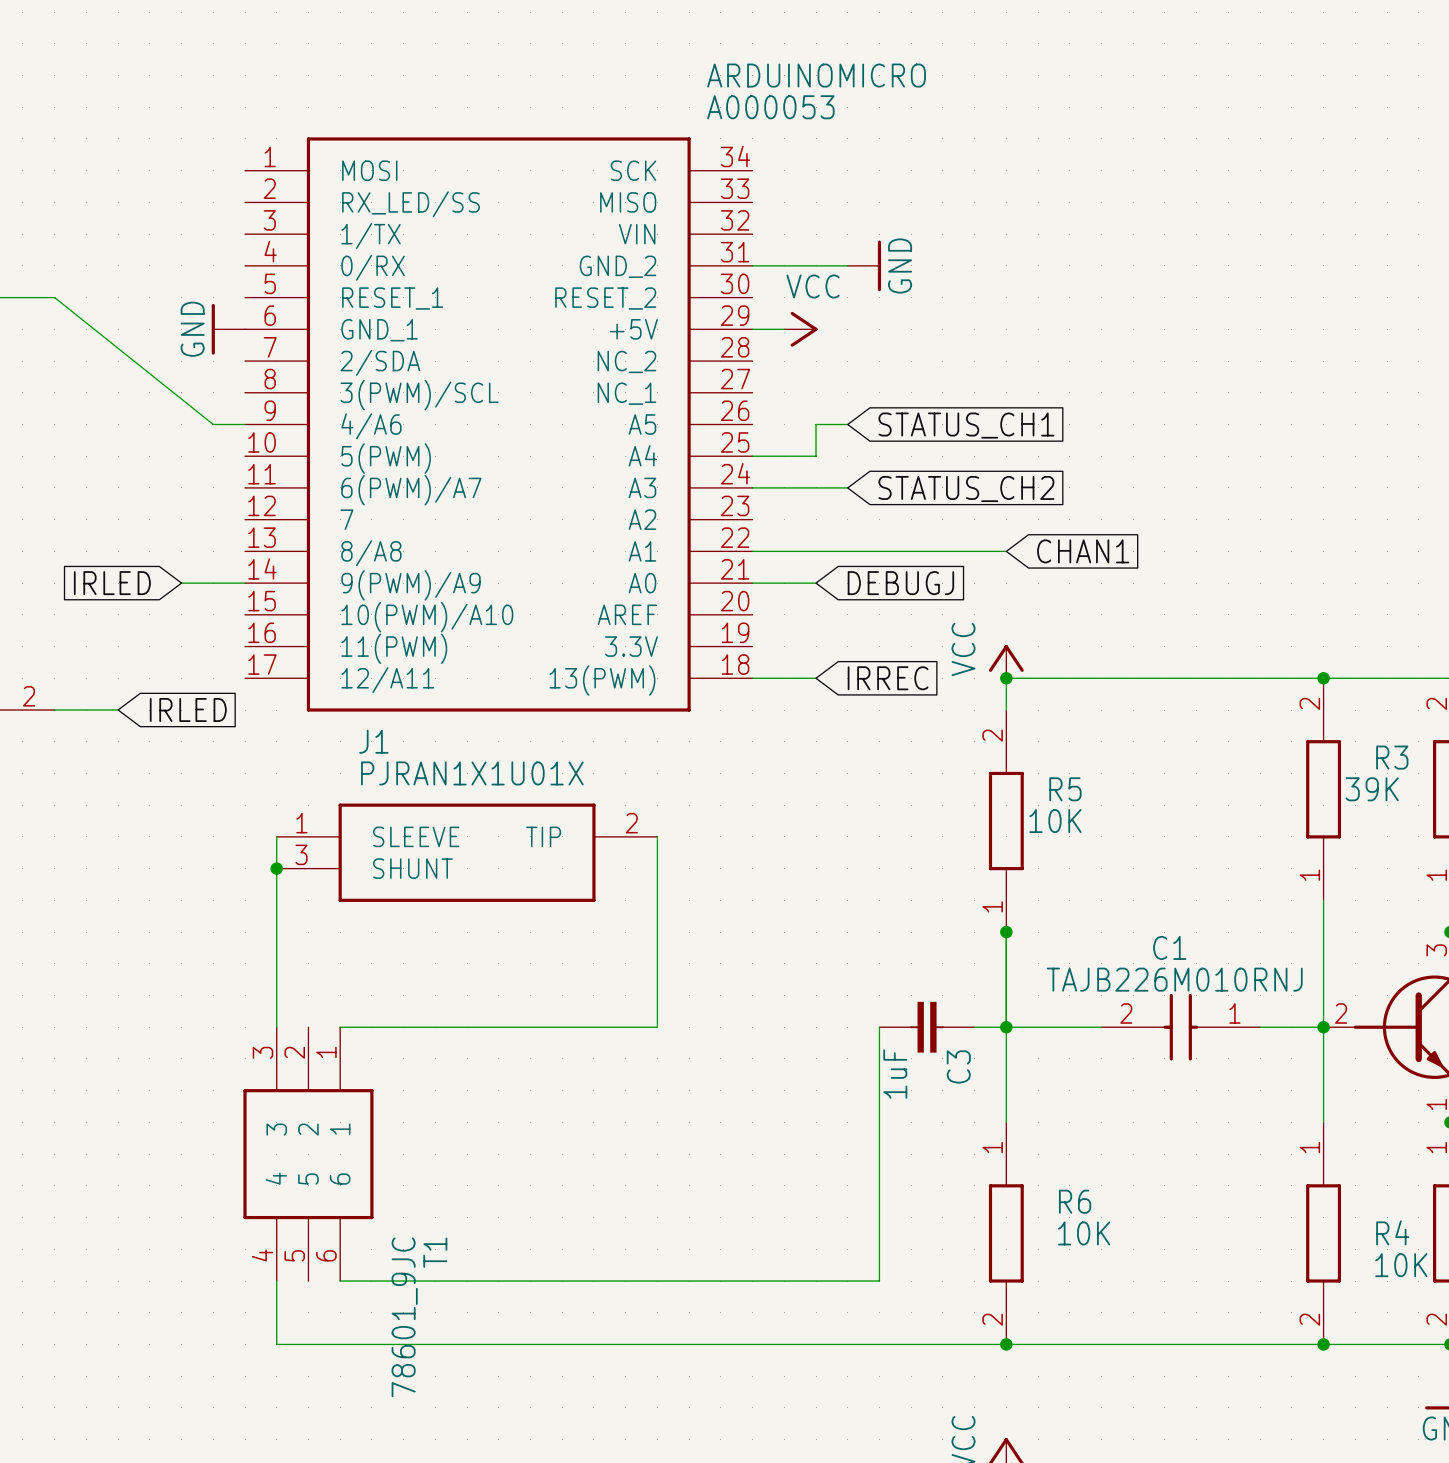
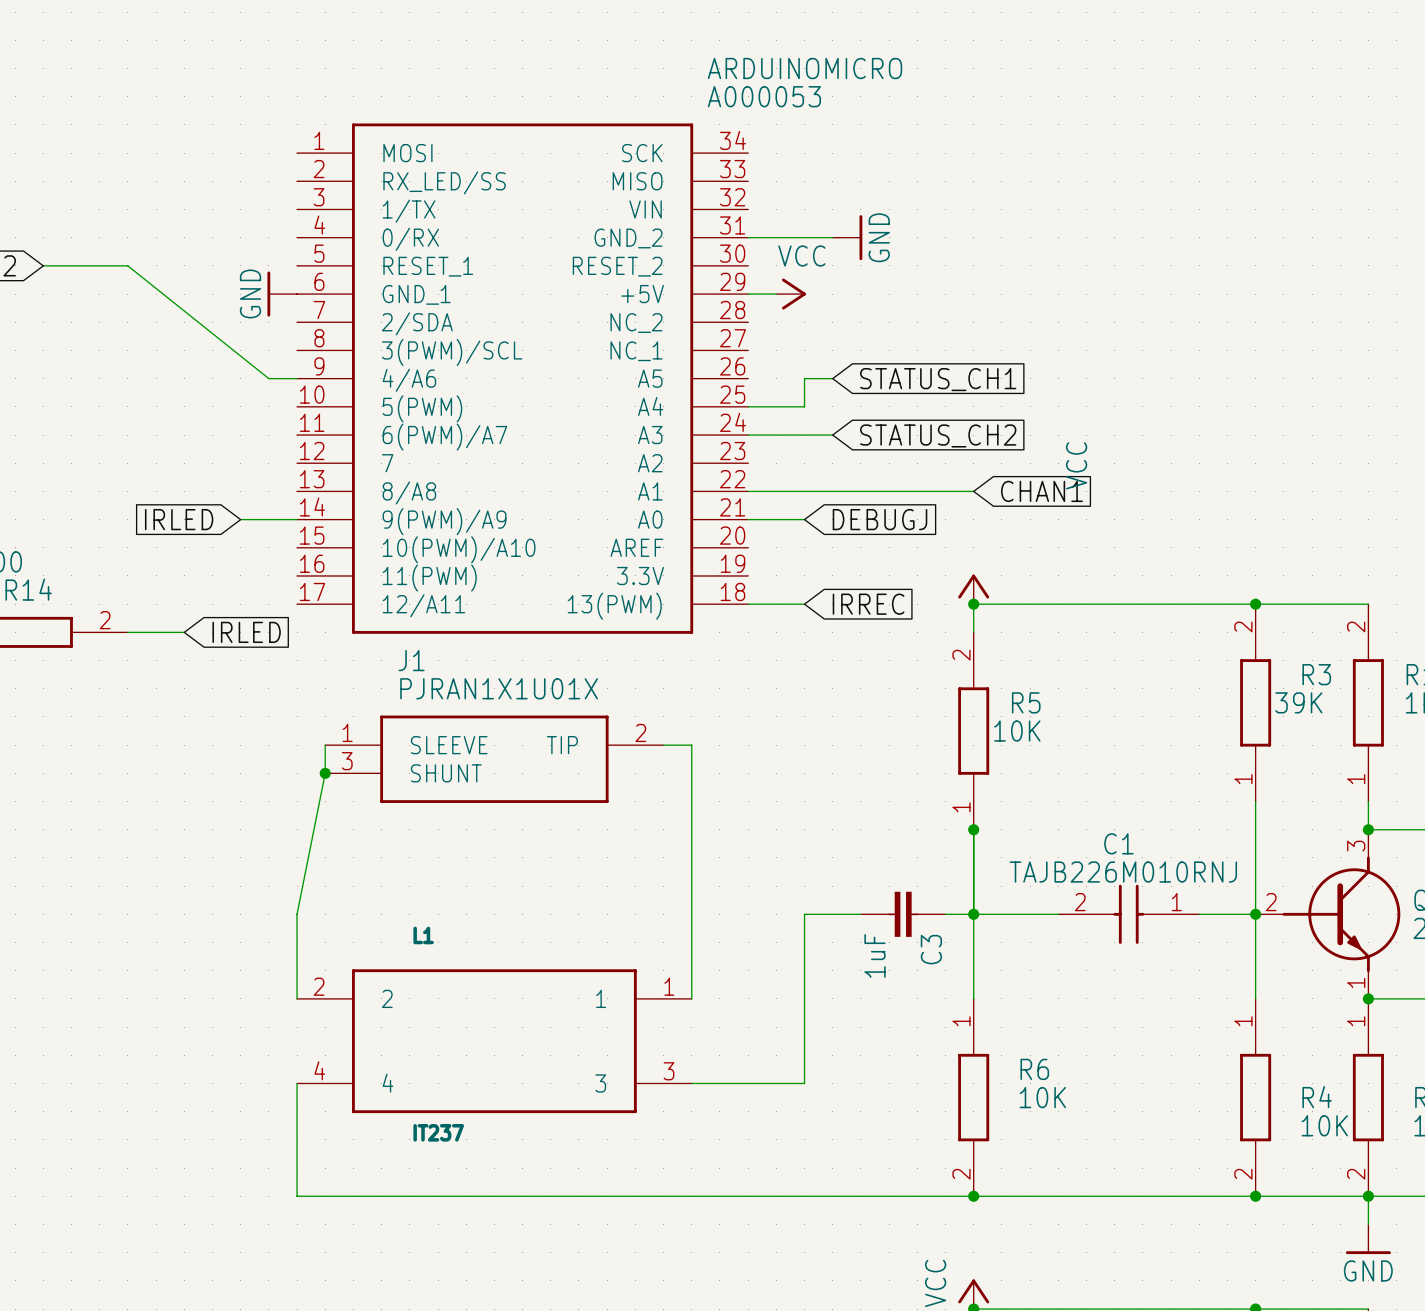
power symbol text position: VCC (963, 649) -> VCC (1076, 465)
wire: (657, 836) (657, 1027) (340, 1027) -> (663, 745) (691, 745) (691, 998)
wire: (276, 868) (276, 1027) -> (325, 773) (297, 914) (297, 998)
wire: (879, 1027) (879, 1281) (340, 1281) -> (860, 914) (804, 914) (804, 1083) (691, 1083)
T1: 78601_9JC (308, 1154) -> none
L1: none -> IT237 (494, 1041)
wire: (276, 1281) (276, 1344) -> (297, 1083) (297, 1196) (325, 1196)

